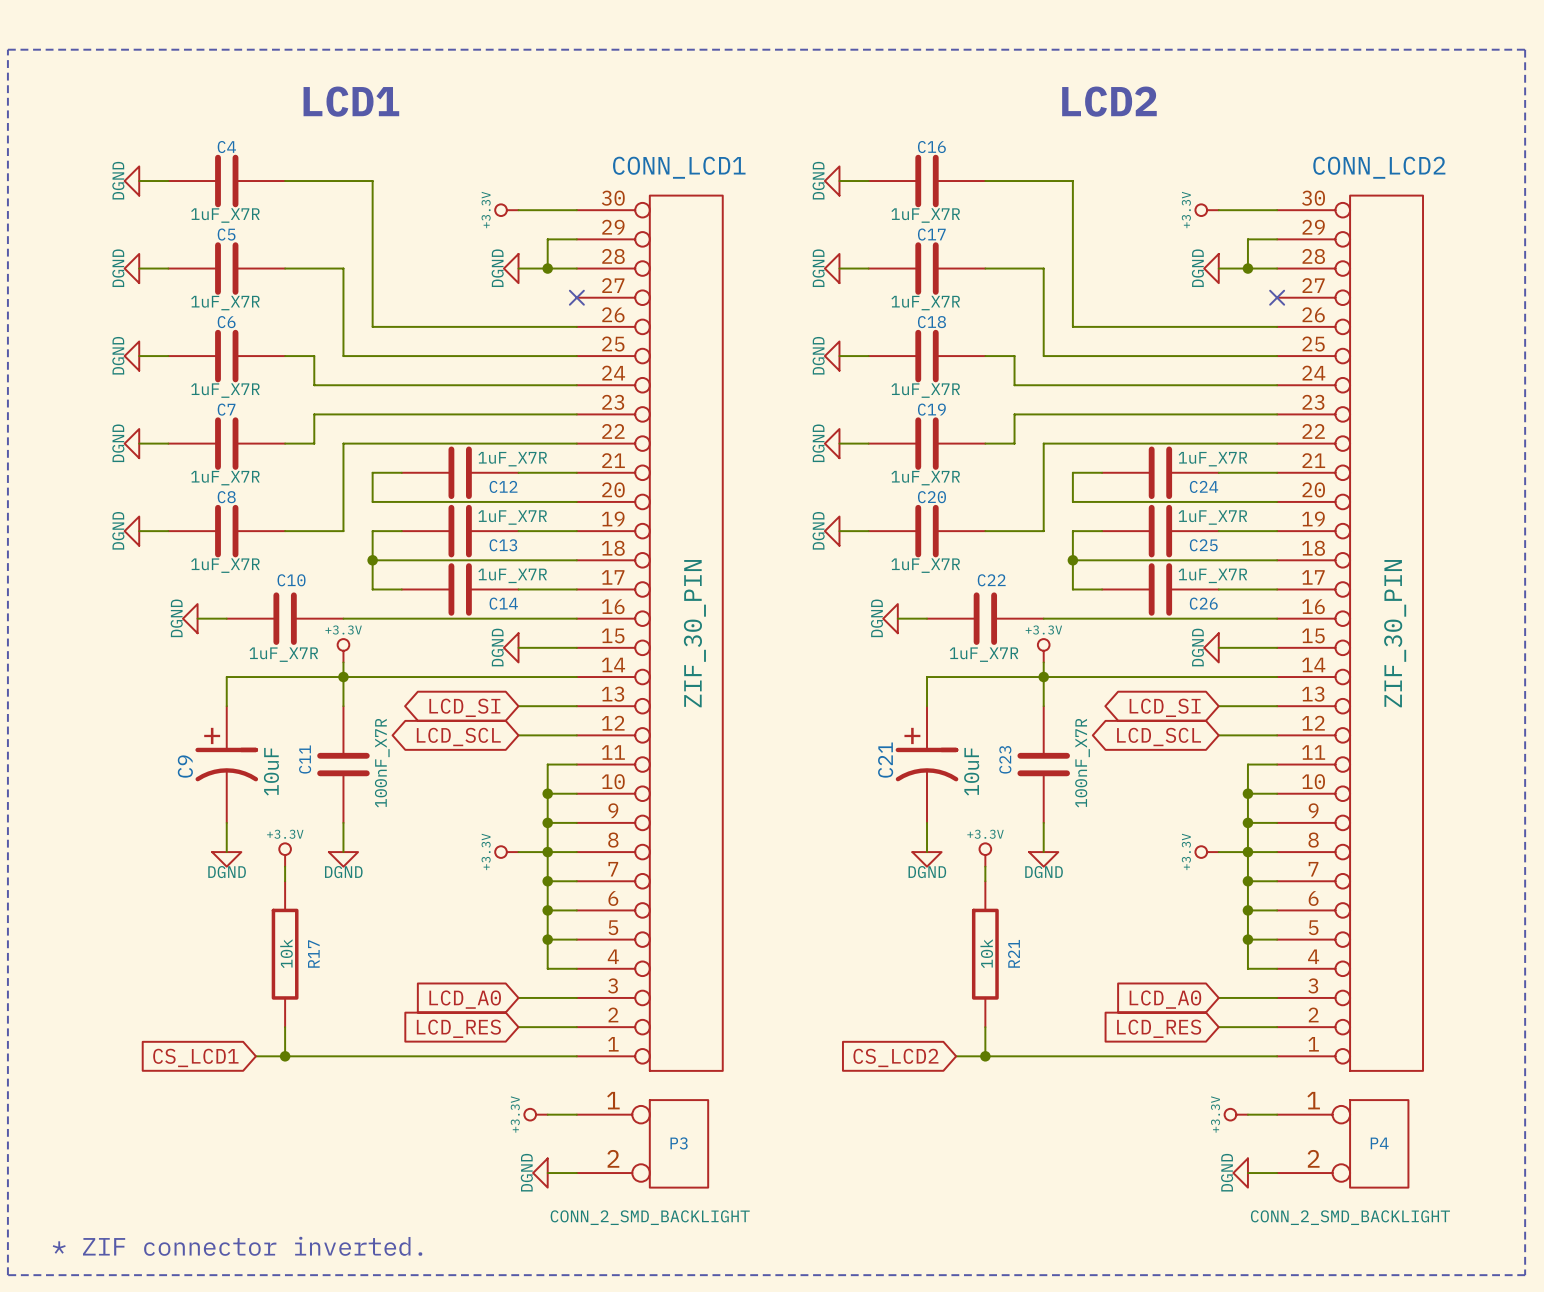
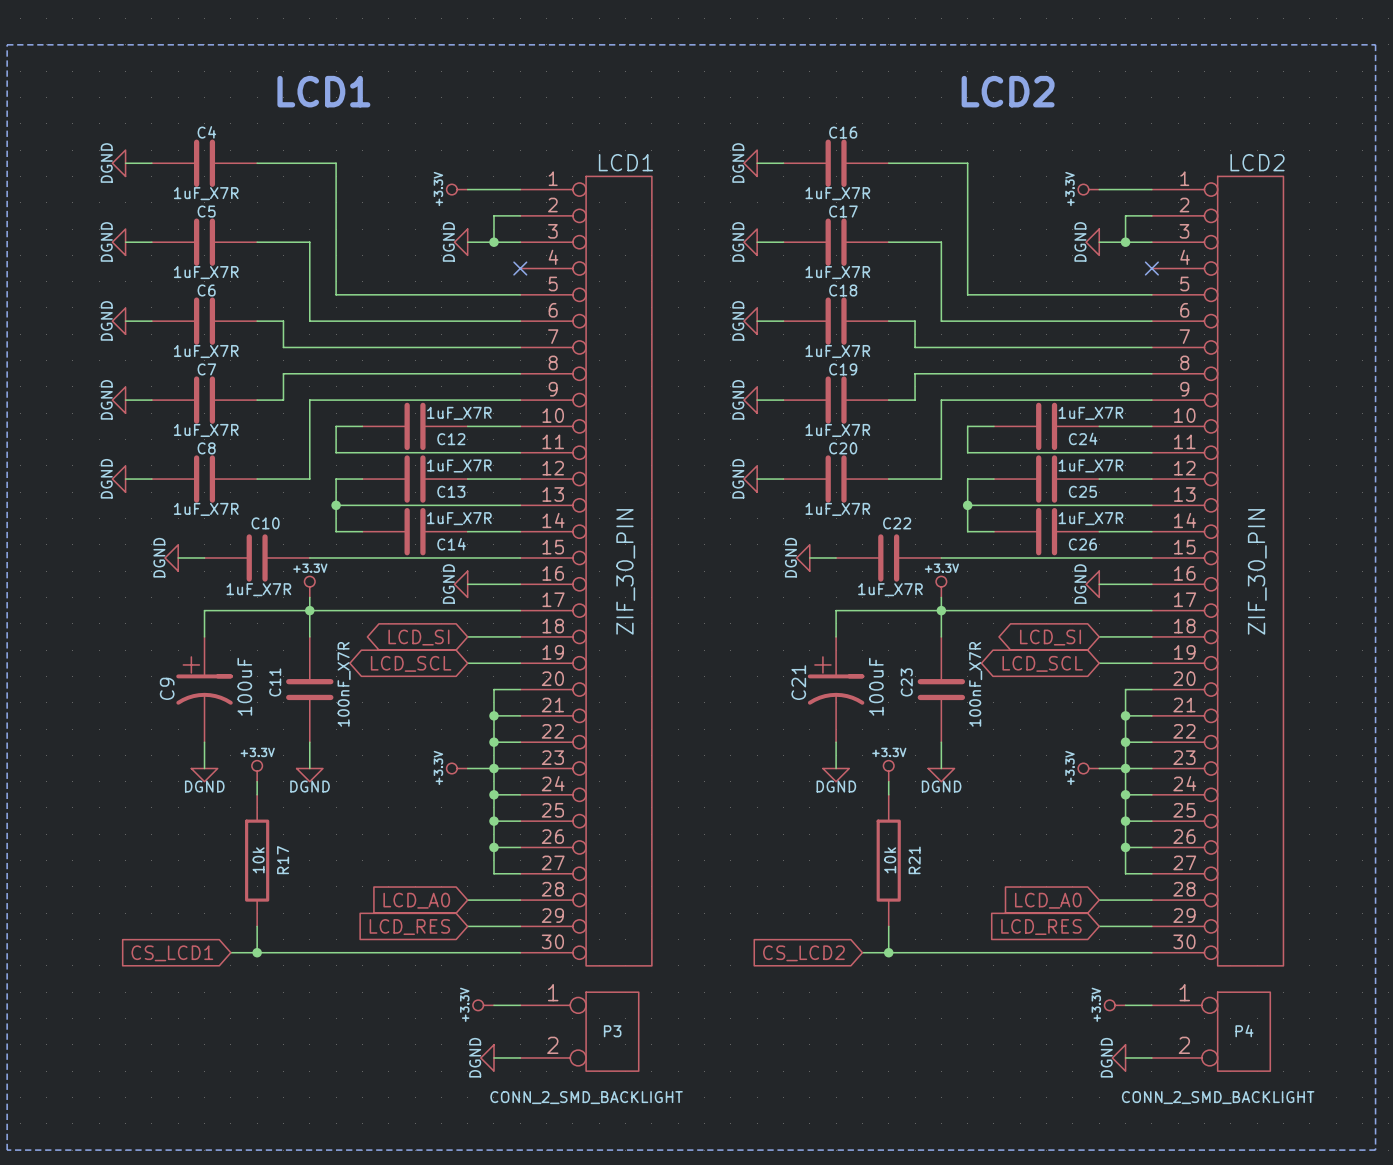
CONN_LCD1 name: CONN_LCD1 (679, 167) -> LCD1 (625, 162)
CONN_LCD2 name: CONN_LCD2 (1379, 167) -> LCD2 (1257, 162)
CONN_LCD1 flip: as is (686, 633) -> up-down (618, 571)
CONN_LCD2 flip: as is (1386, 633) -> up-down (1250, 571)
C9 value: 10uF (271, 771) -> 100uF (244, 686)
C21 value: 10uF (971, 771) -> 100uF (876, 686)
text: * ZIF connector inverted. (237, 1246) -> none

